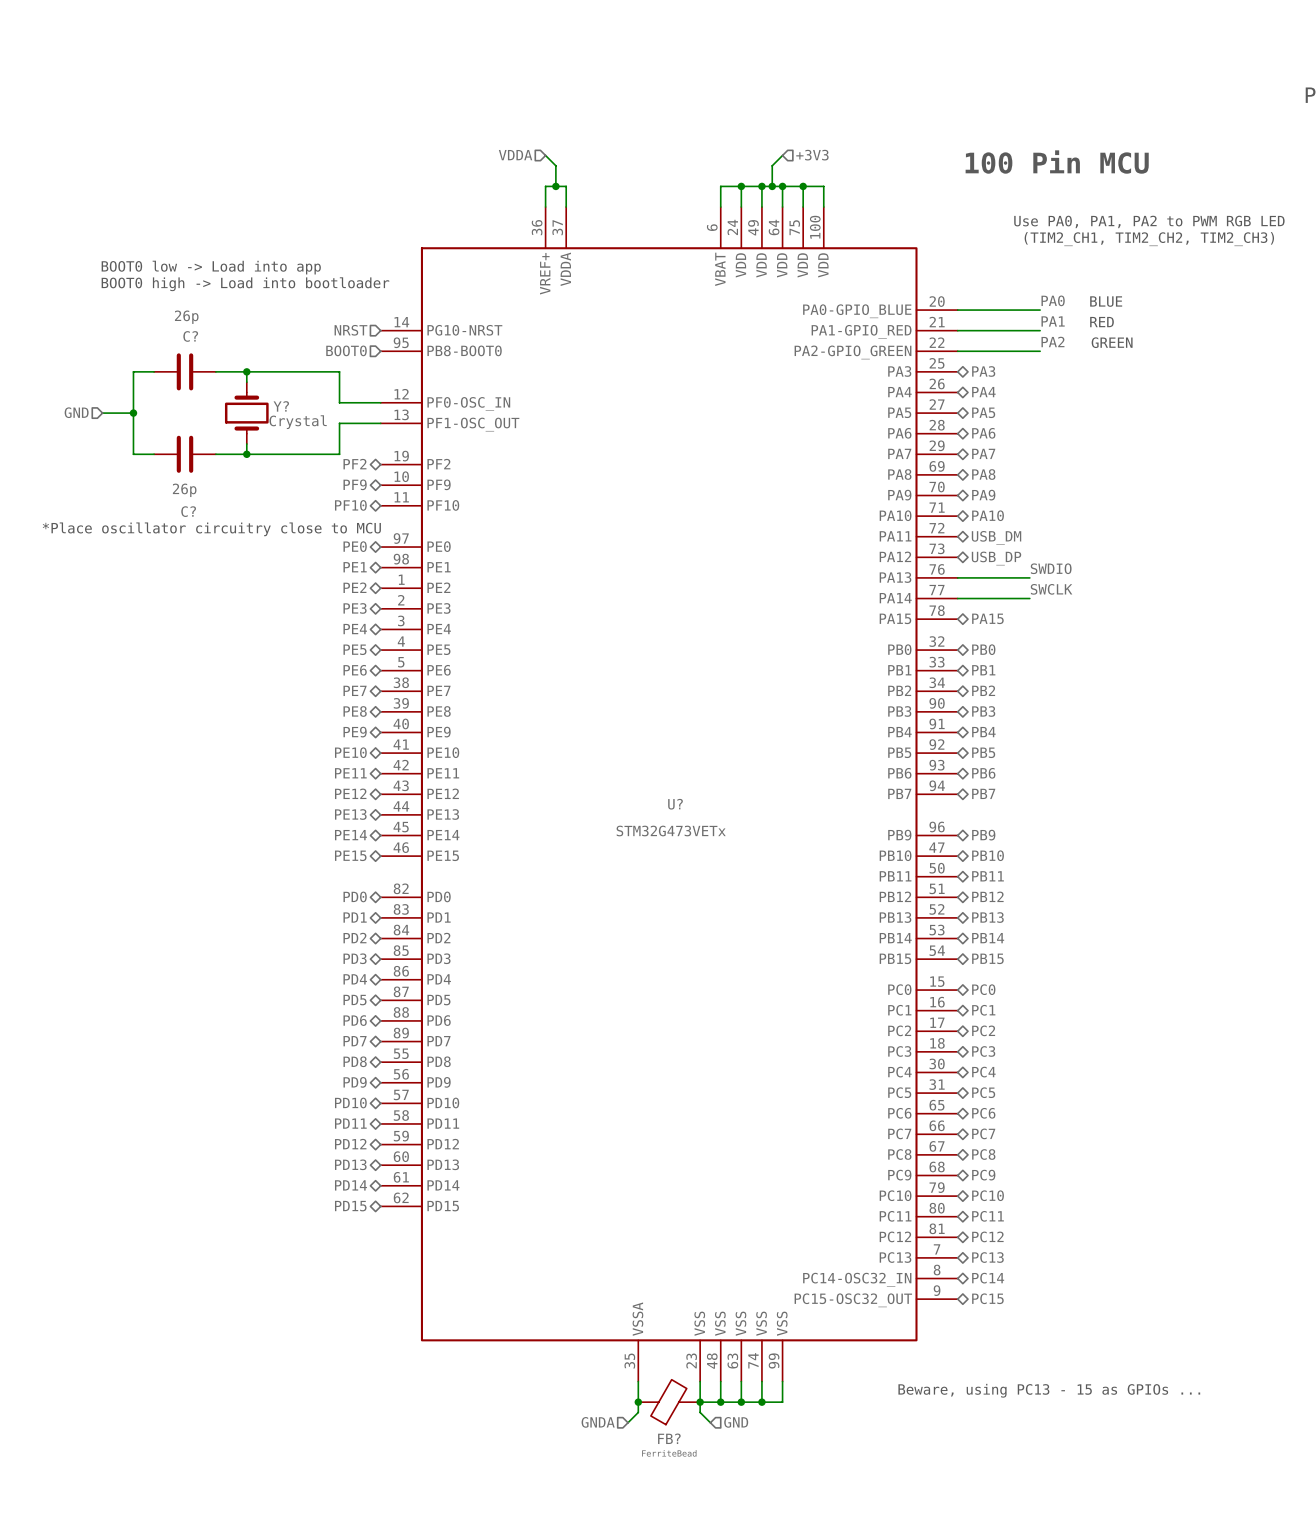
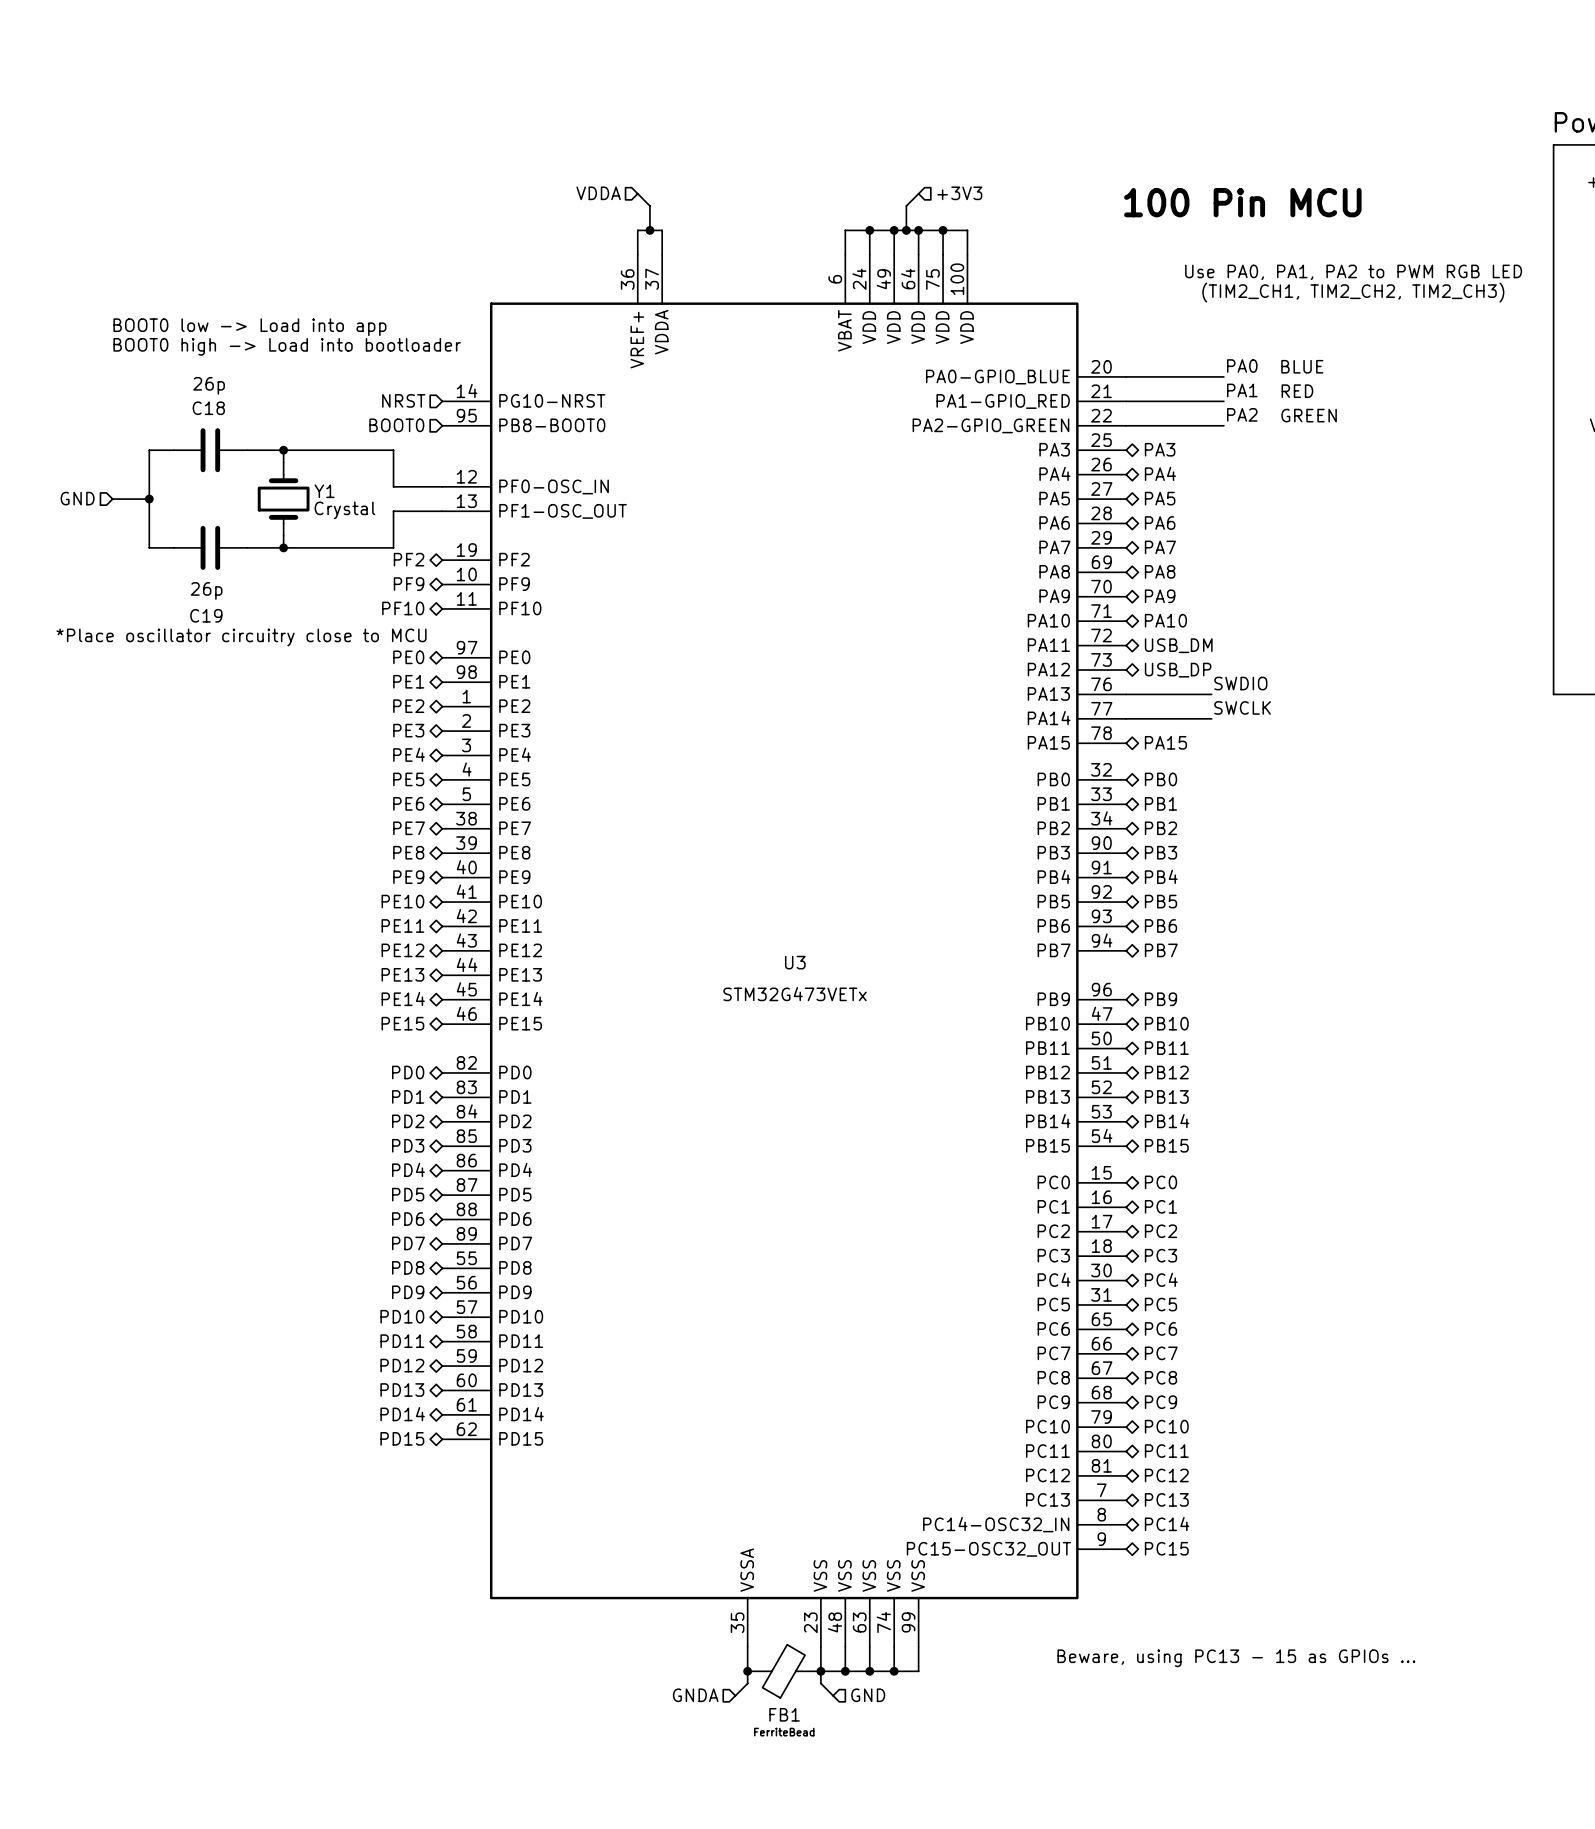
C? name: C? (190, 336) -> C18 (208, 408)
Y? name: Y? (281, 406) -> Y1 (324, 491)
C? name: C? (188, 511) -> C19 (206, 615)
U? name: U? (675, 804) -> U3 (795, 962)
FB? name: FB? (669, 1438) -> FB1 (784, 1714)

